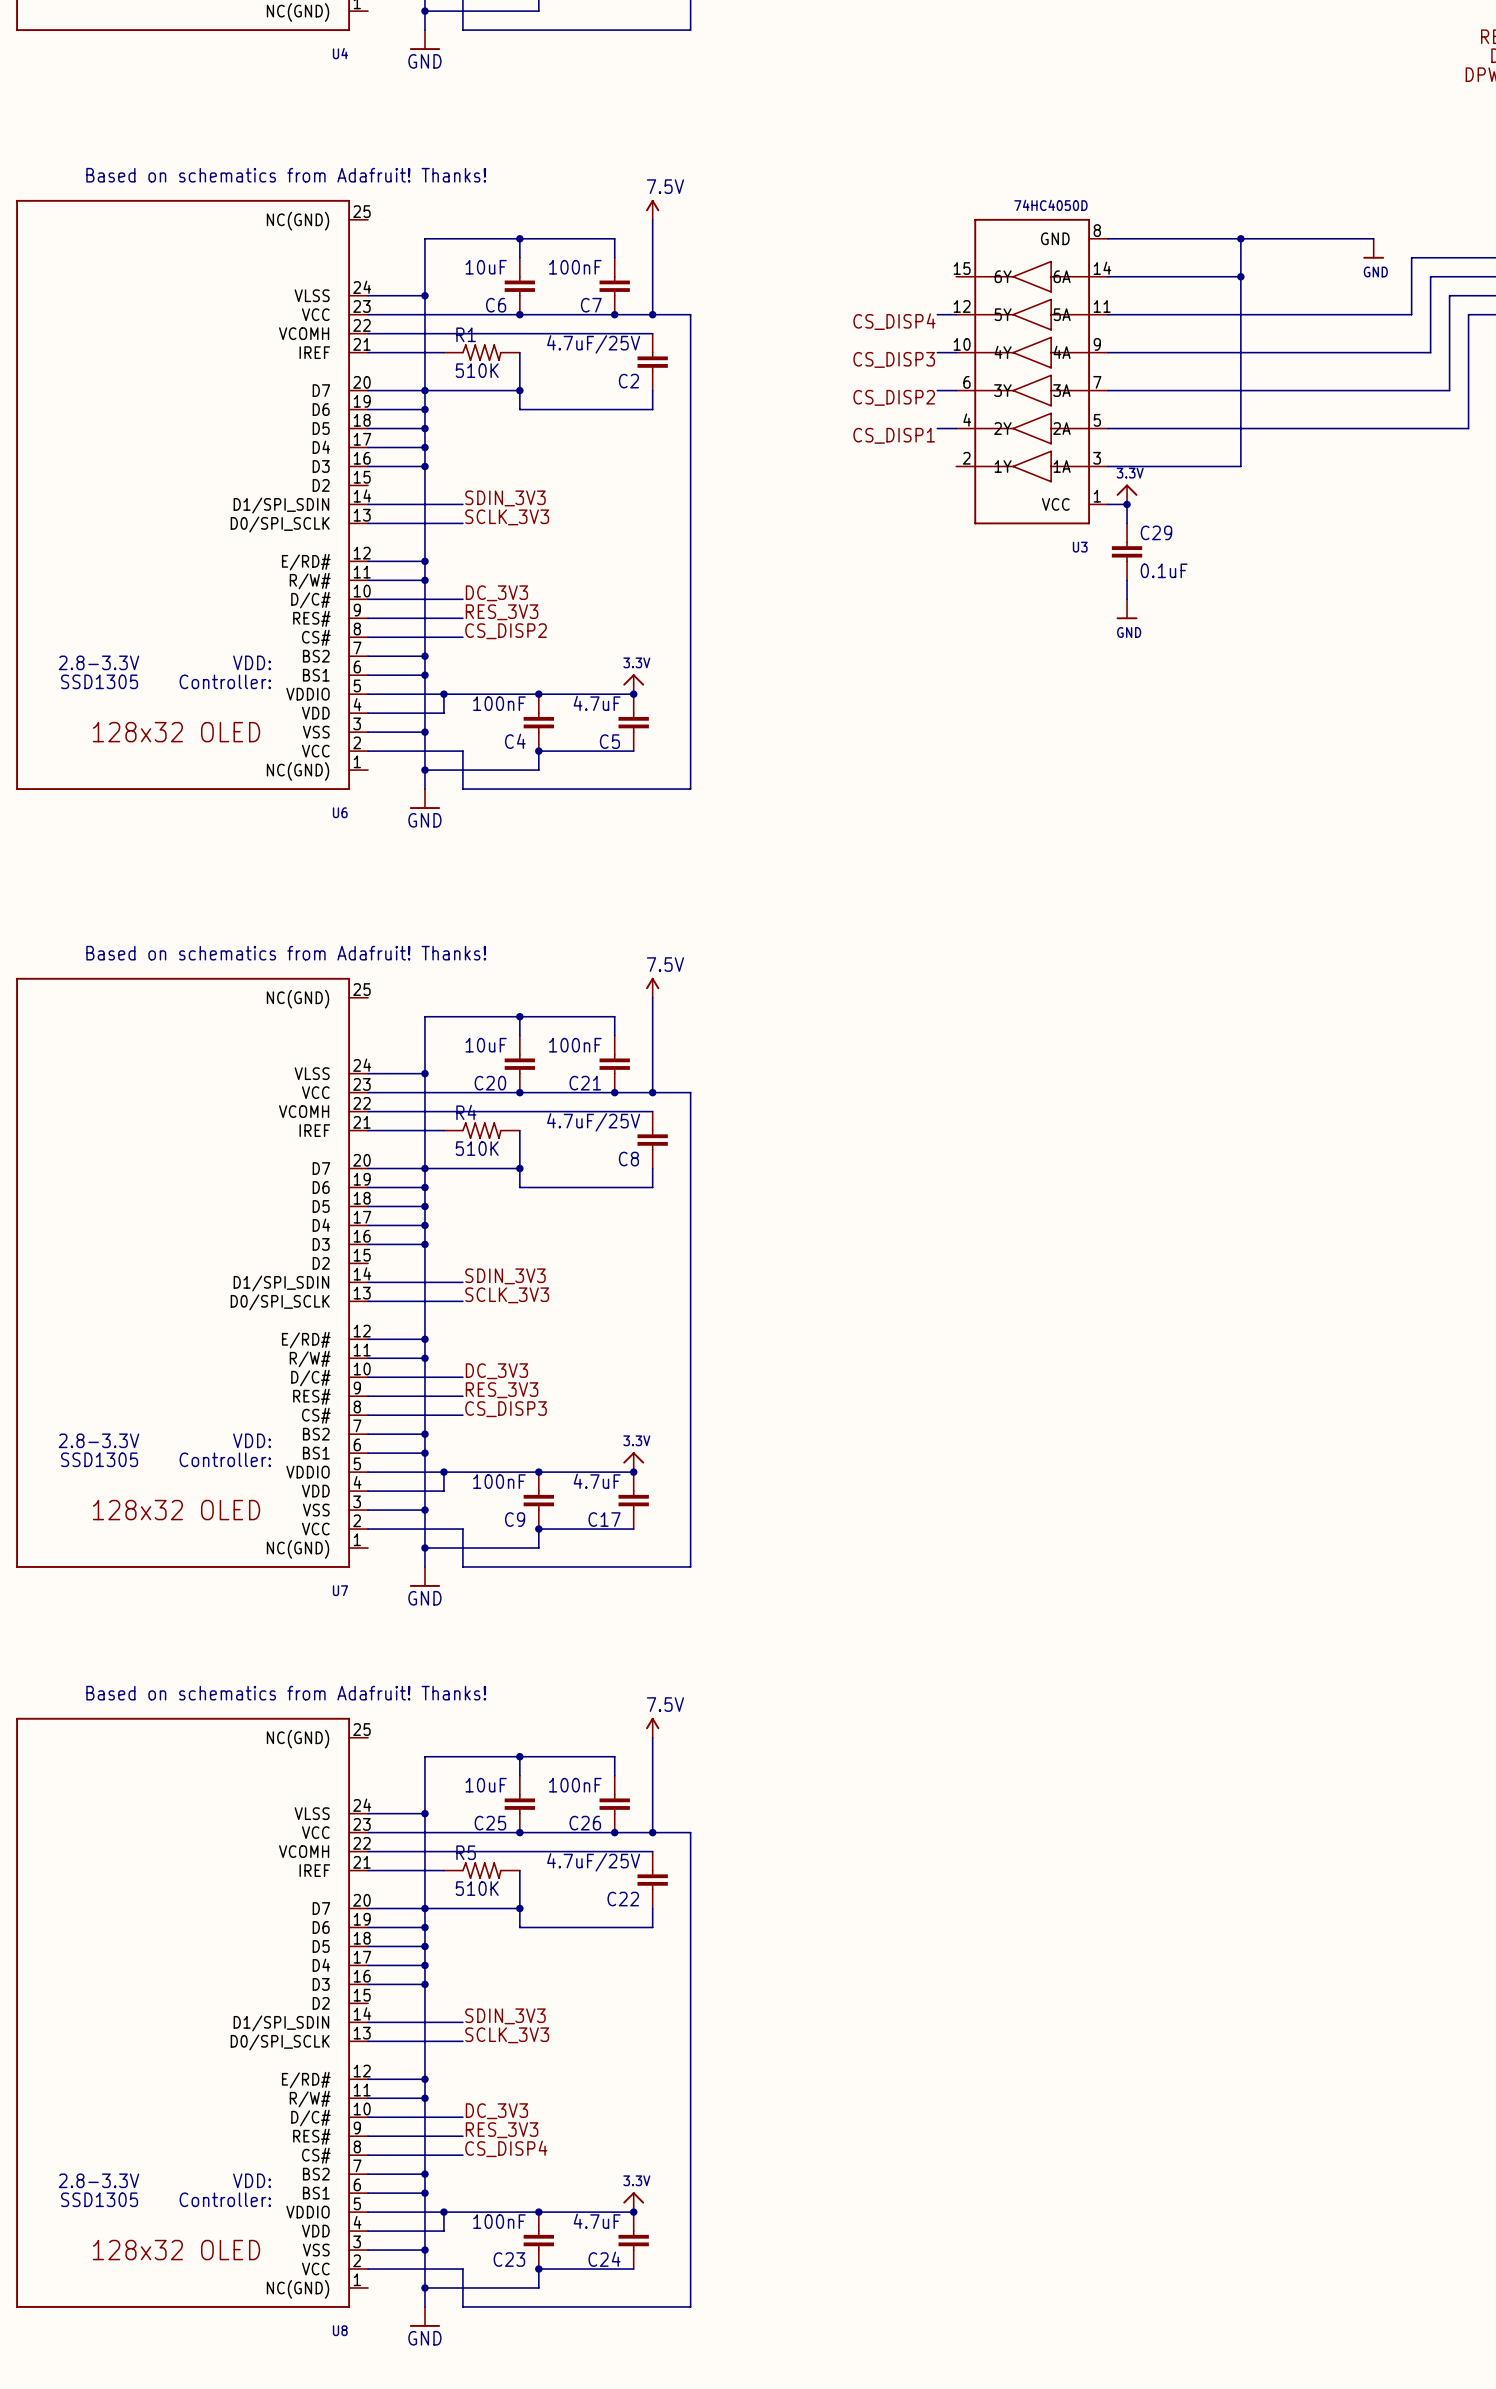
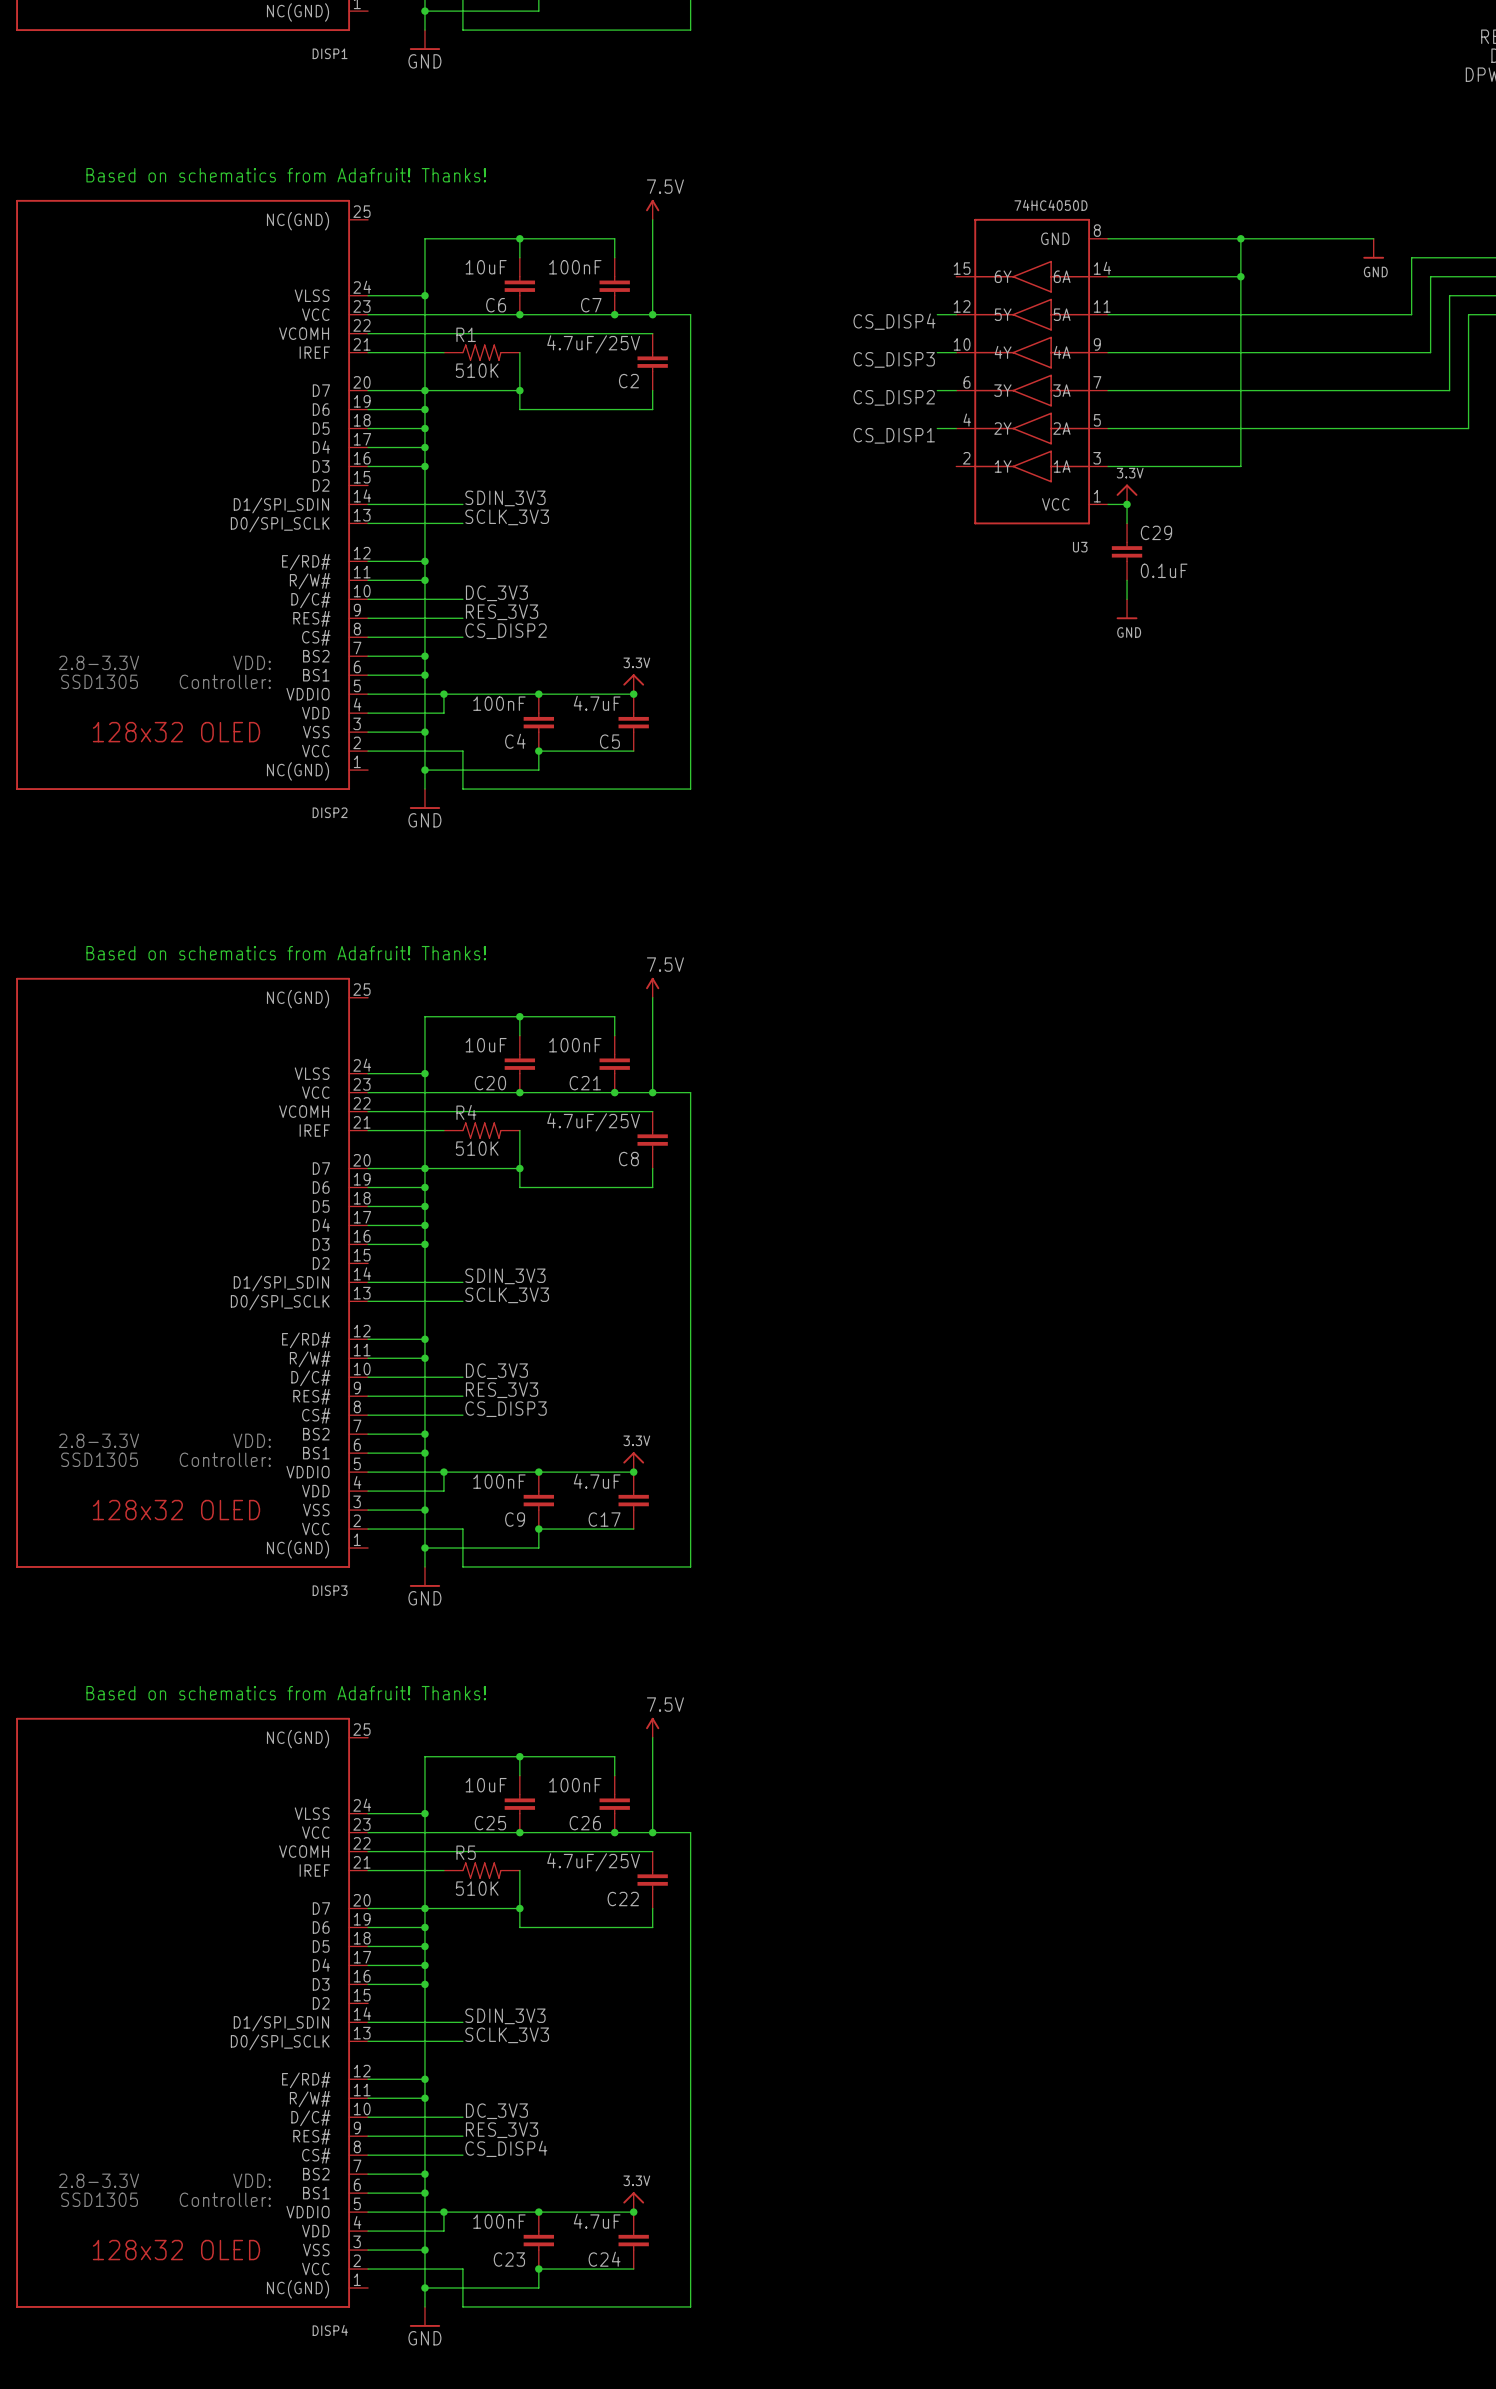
U4 name: U4 (340, 53) -> DISP1 (330, 53)
U6 name: U6 (340, 812) -> DISP2 (330, 812)
U7 name: U7 (340, 1590) -> DISP3 (330, 1590)
U8 name: U8 (340, 2330) -> DISP4 (330, 2330)

